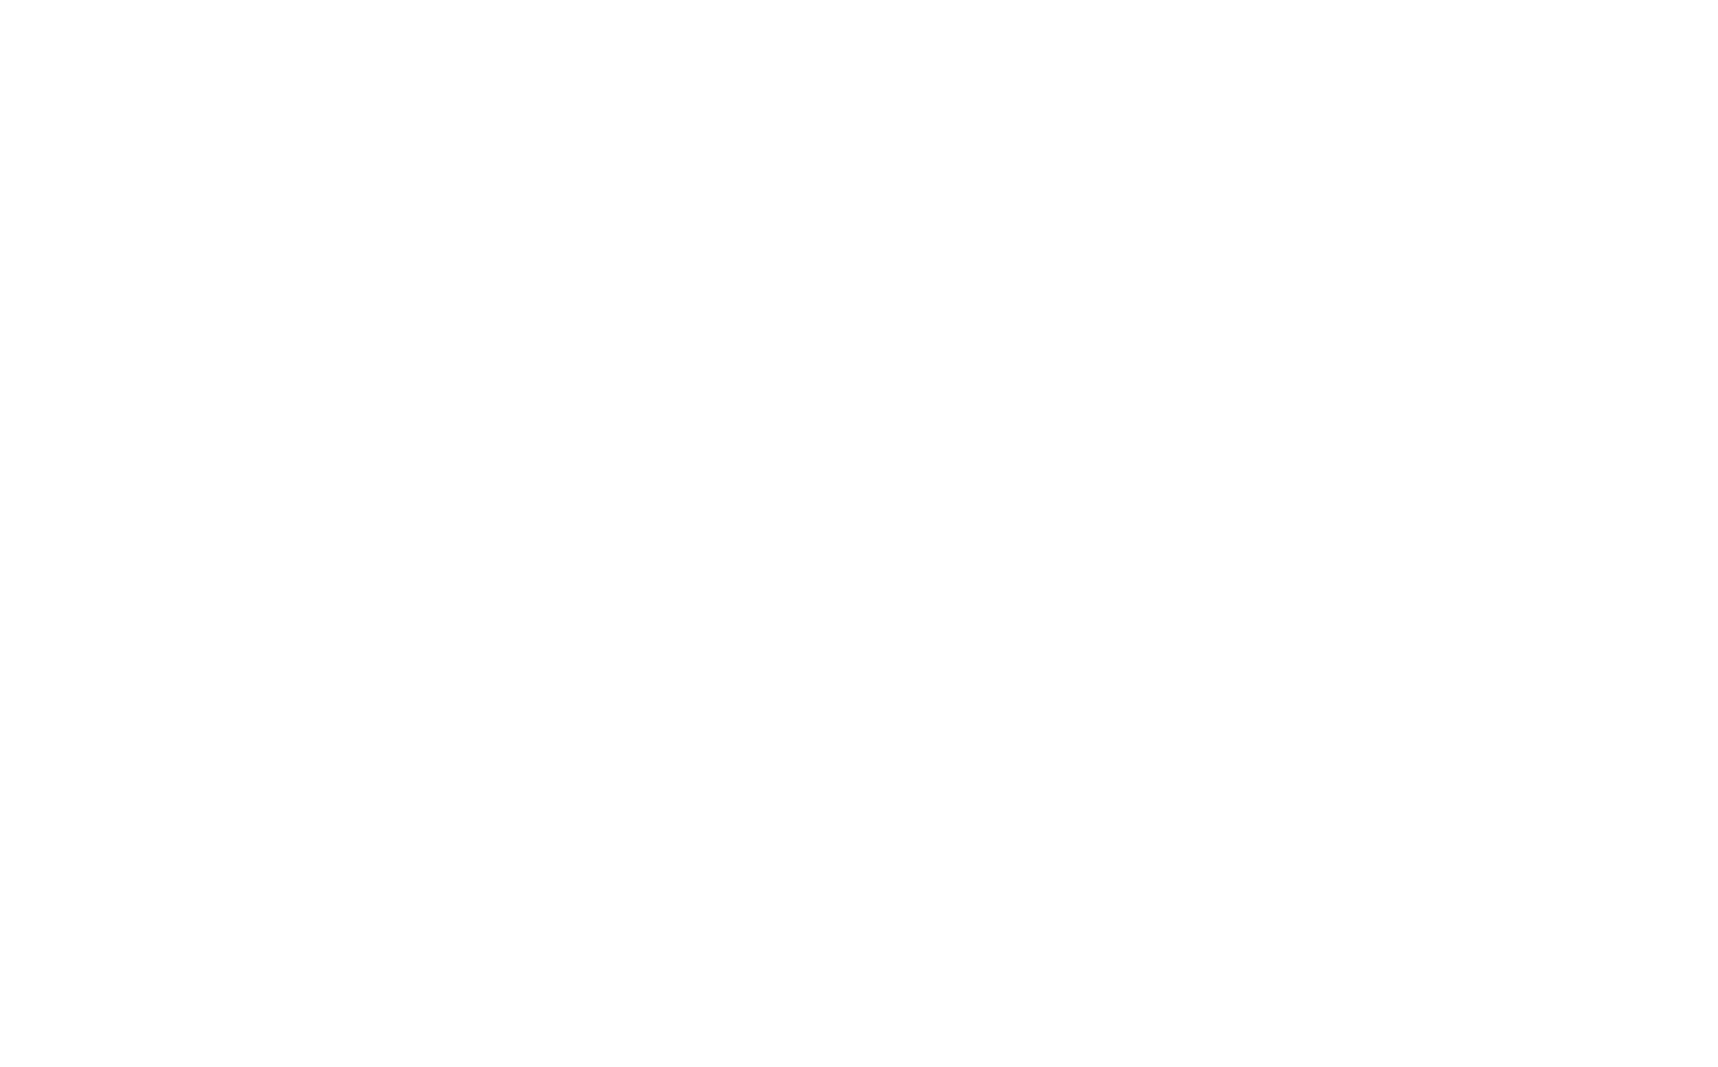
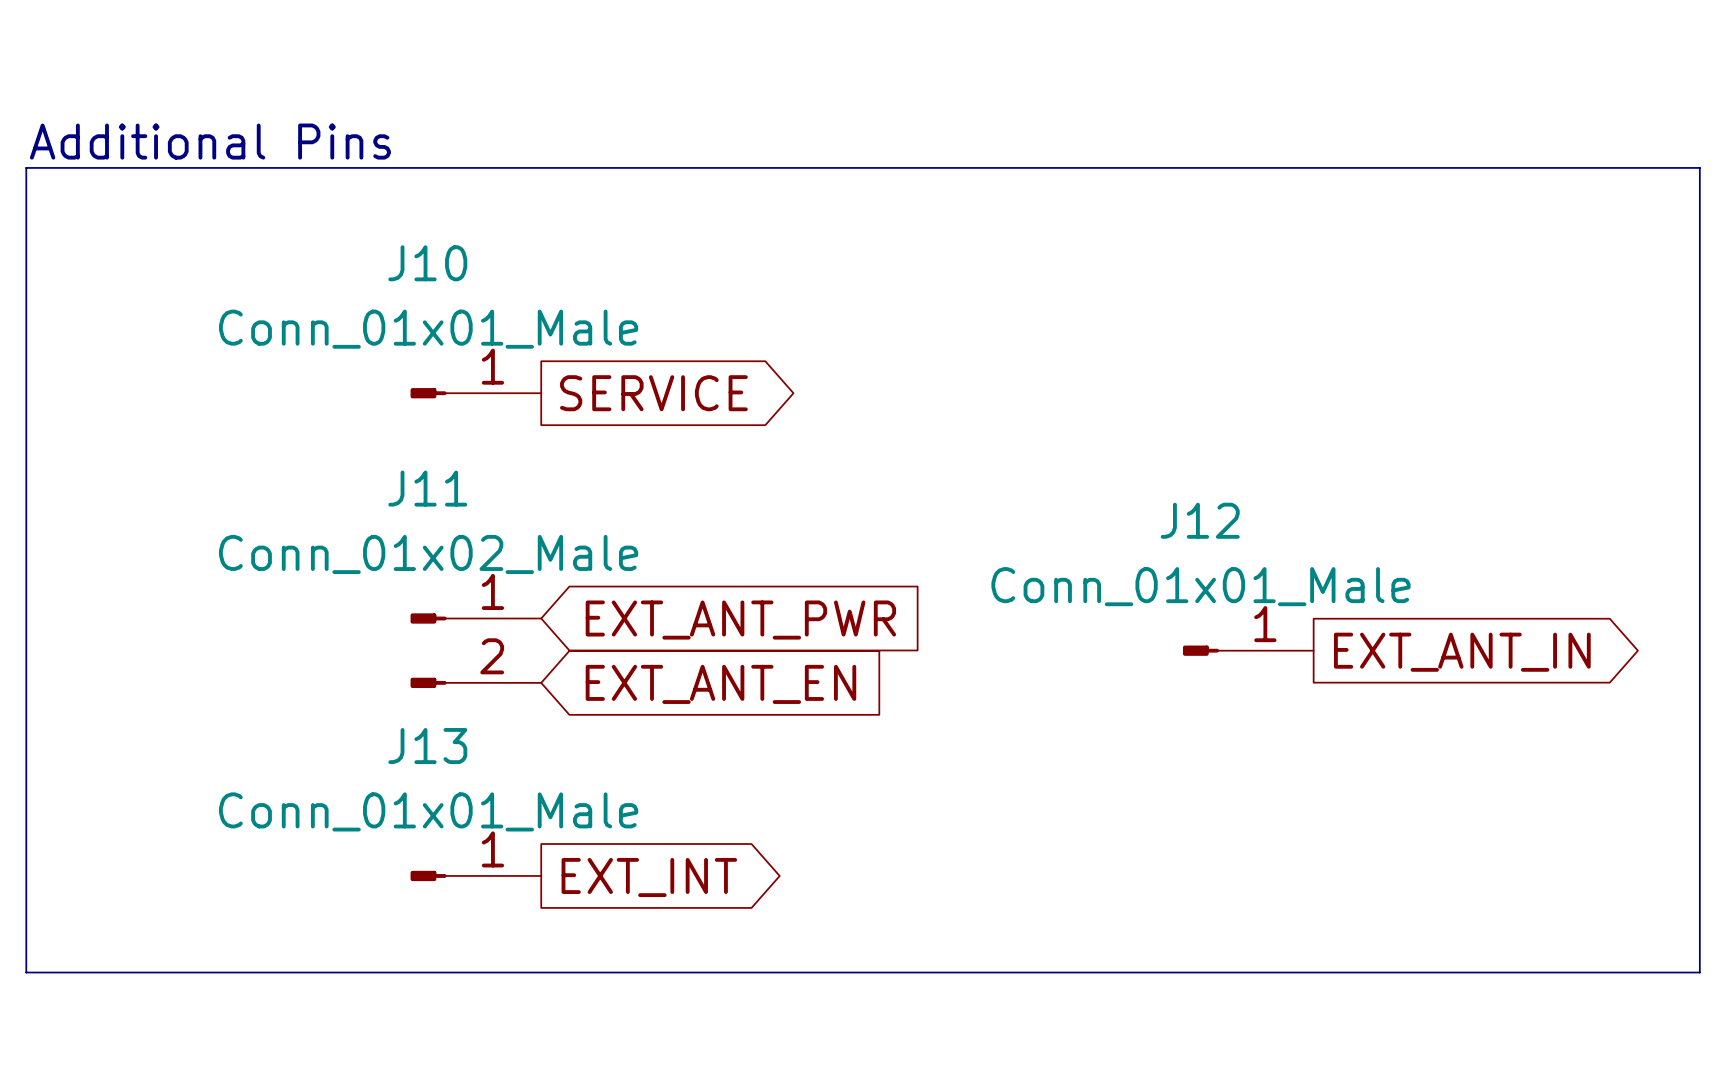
text: none -> Additional Pins (210, 141)
line: none -> (26, 167) (26, 972) (1699, 972) (1699, 167) (26, 167)
J10: none -> Conn_01x01_Male (475, 393)
global label: none -> SERVICE (653, 393)
global label: none -> EXT_ANT_PWR (740, 620)
J11: none -> Conn_01x02_Male (475, 650)
J12: none -> Conn_01x01_Male (1248, 650)
global label: none -> EXT_ANT_IN (1462, 652)
global label: none -> EXT_ANT_EN (720, 684)
J13: none -> Conn_01x01_Male (475, 875)
global label: none -> EXT_INT (649, 877)

